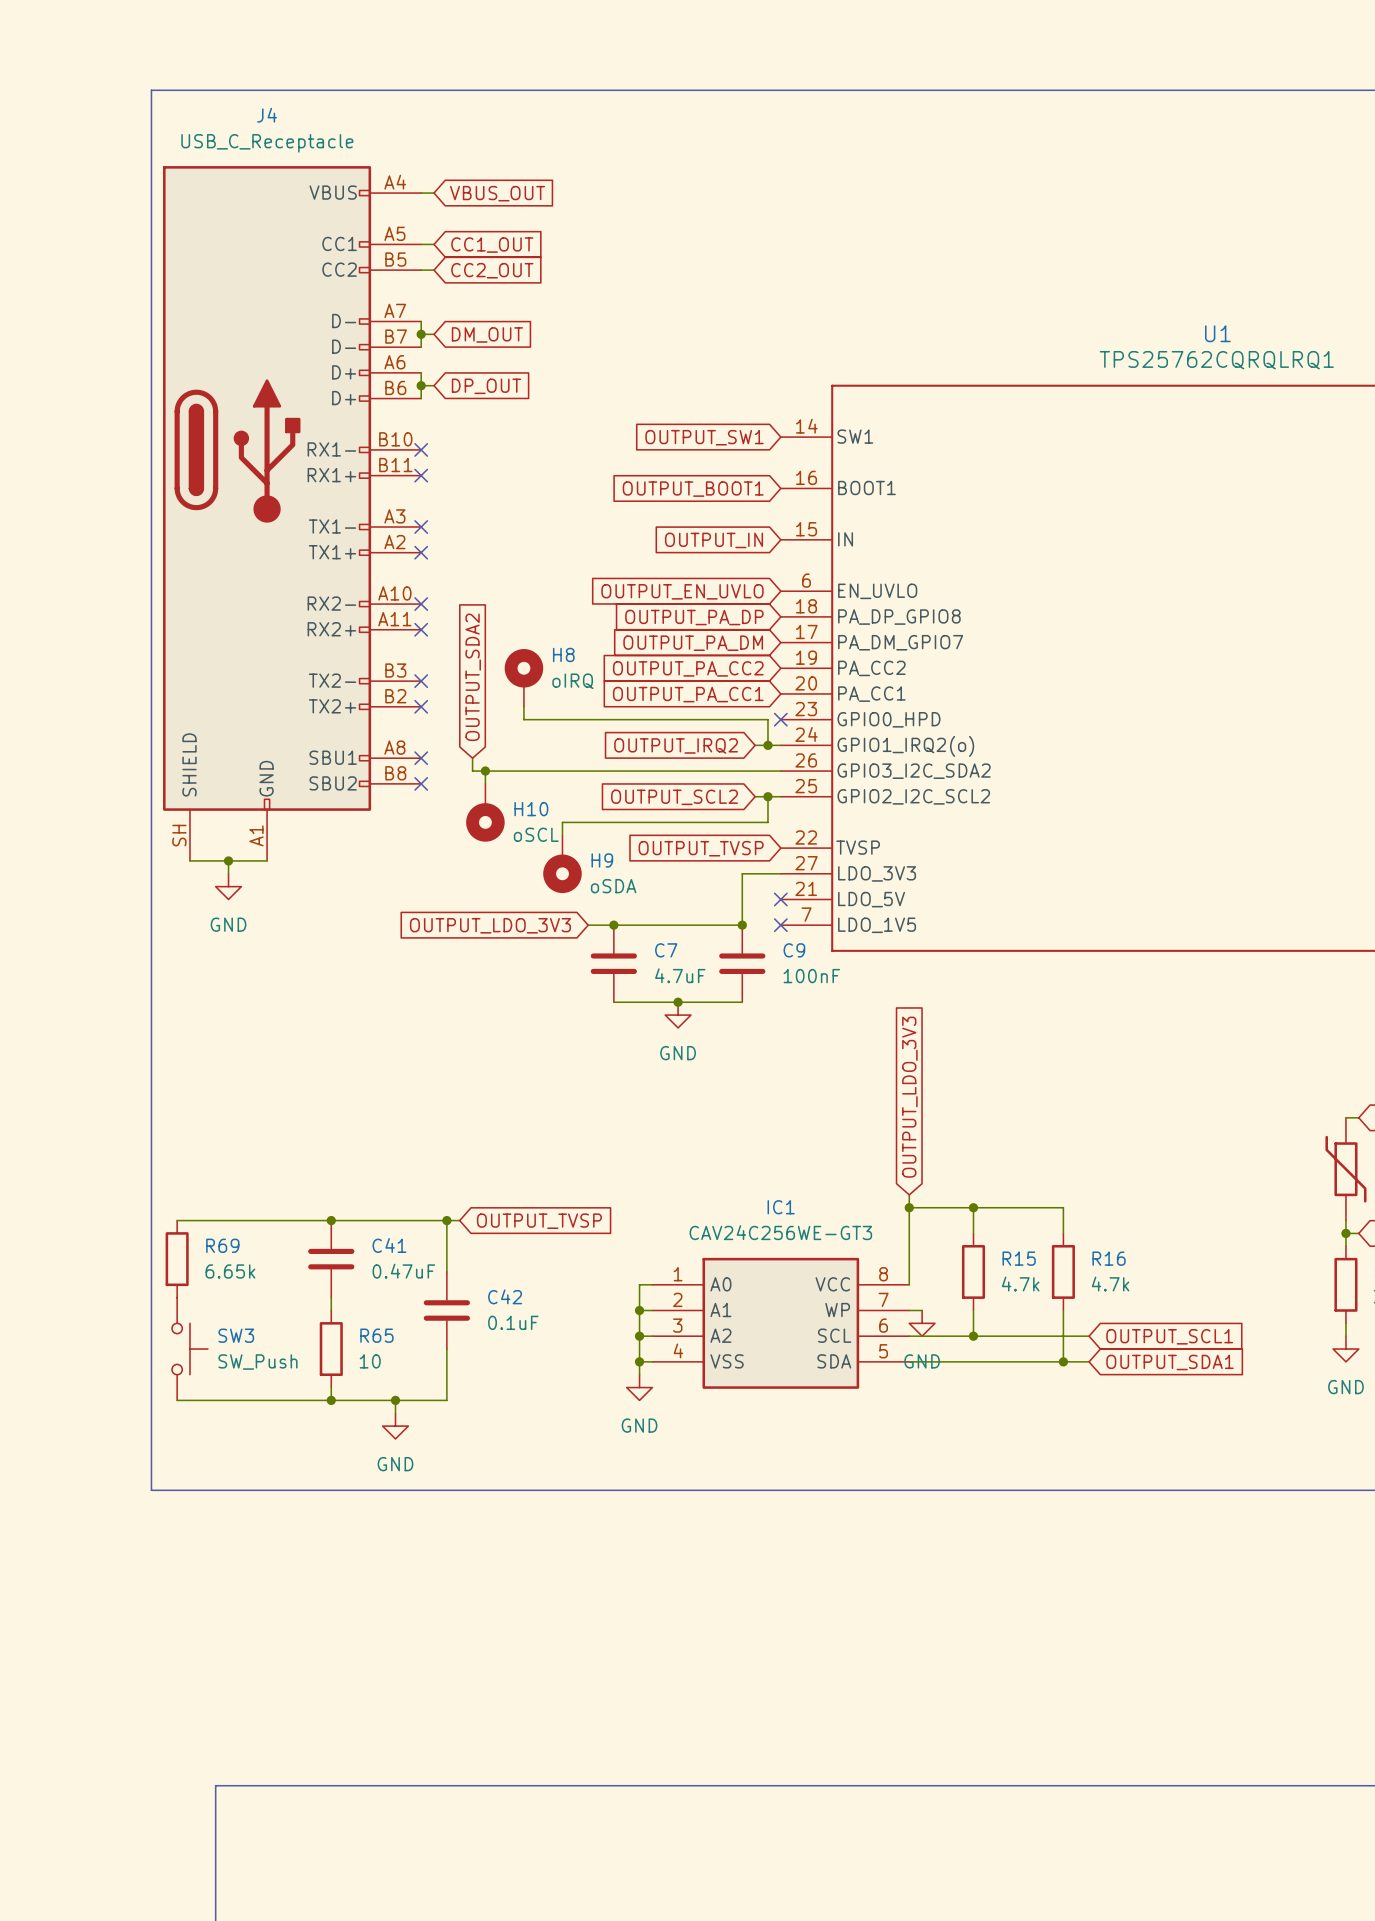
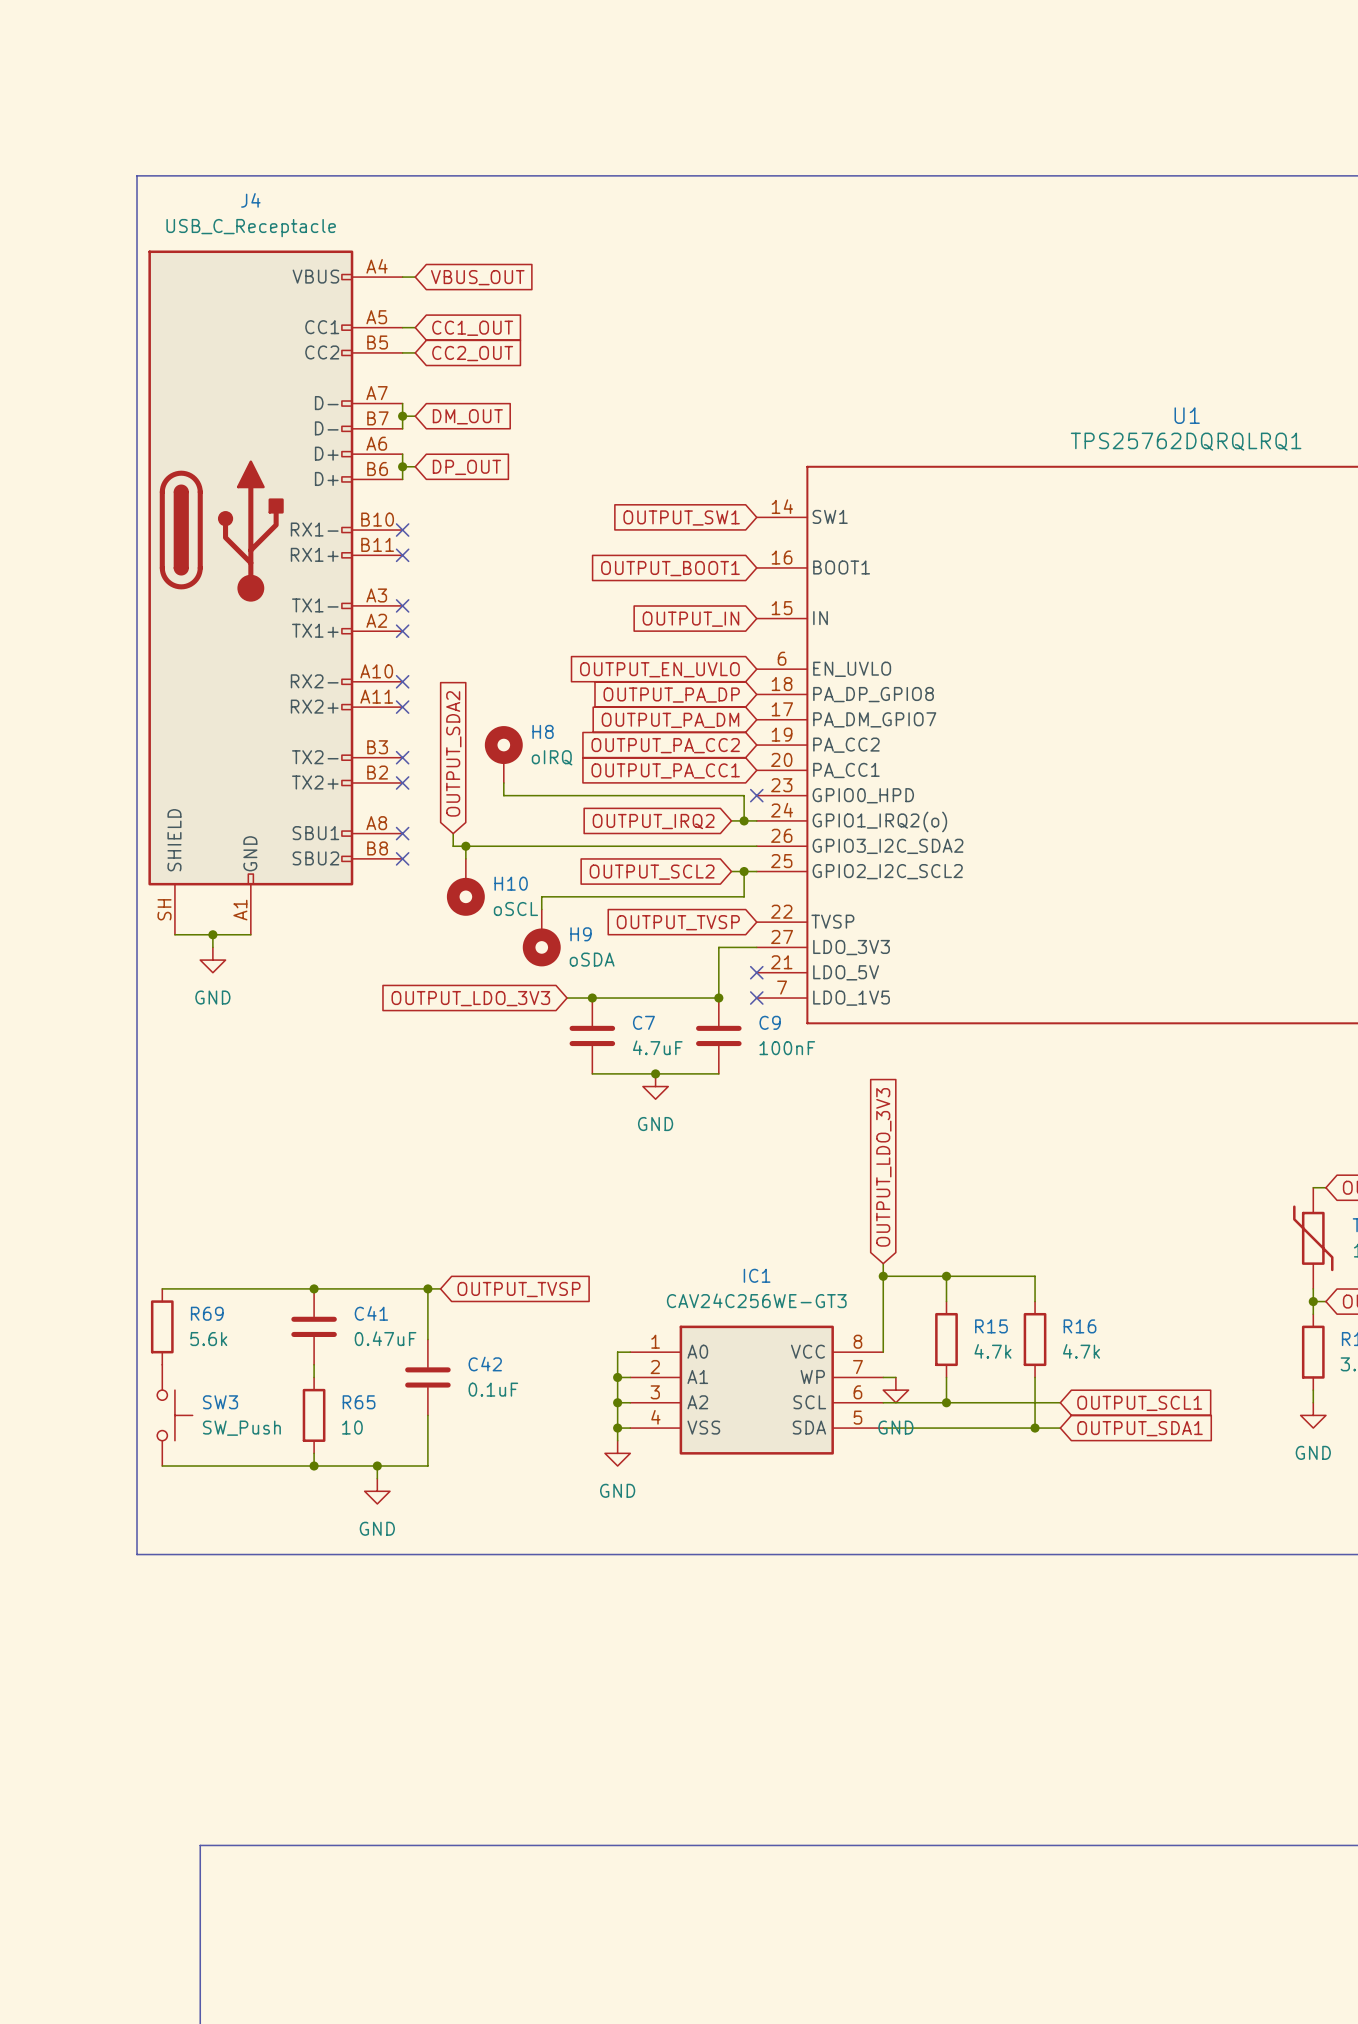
U1 value: TPS25762CQRQLRQ1 (1216, 360) -> TPS25762DQRQLRQ1 (1186, 441)
R69 value: 6.65k (230, 1271) -> 5.6k (208, 1339)

